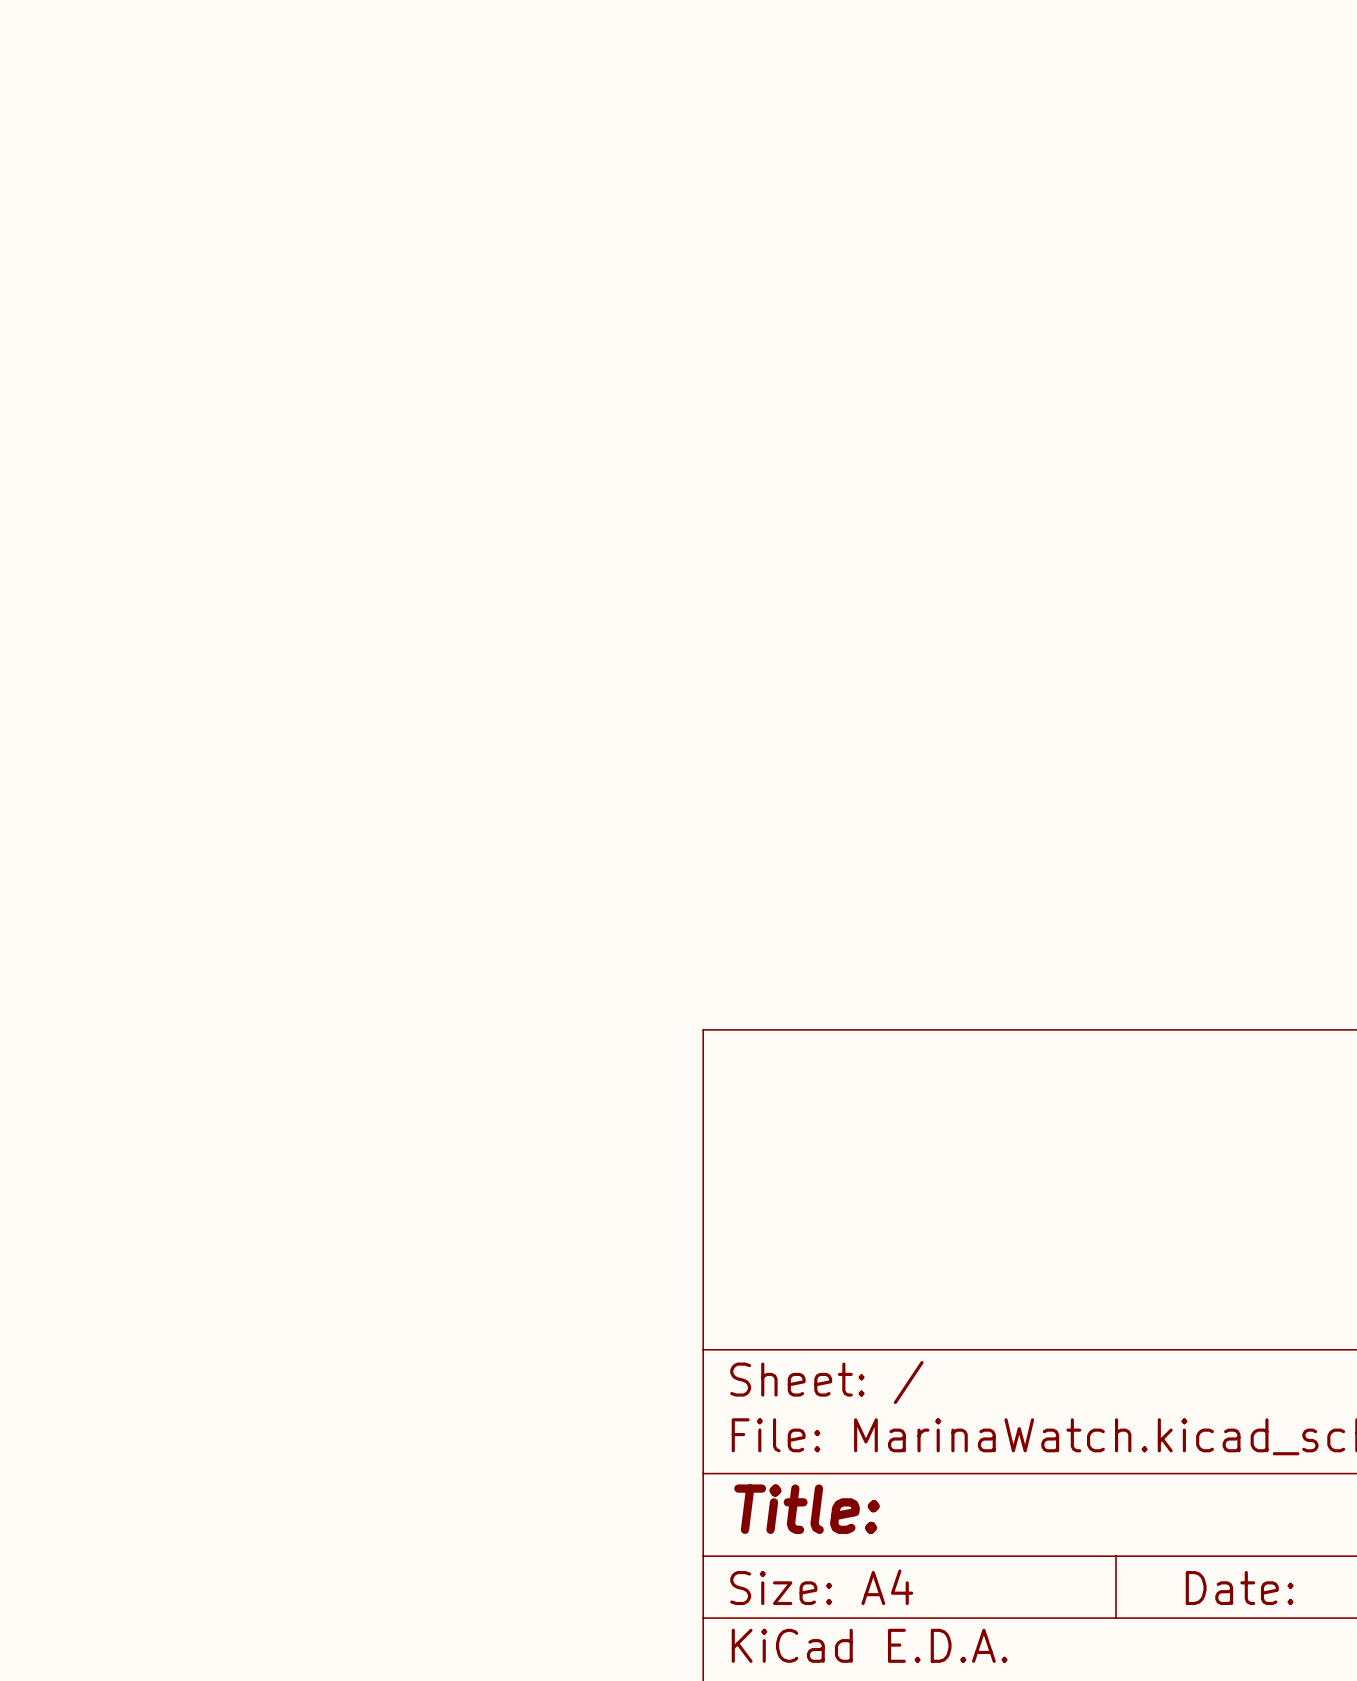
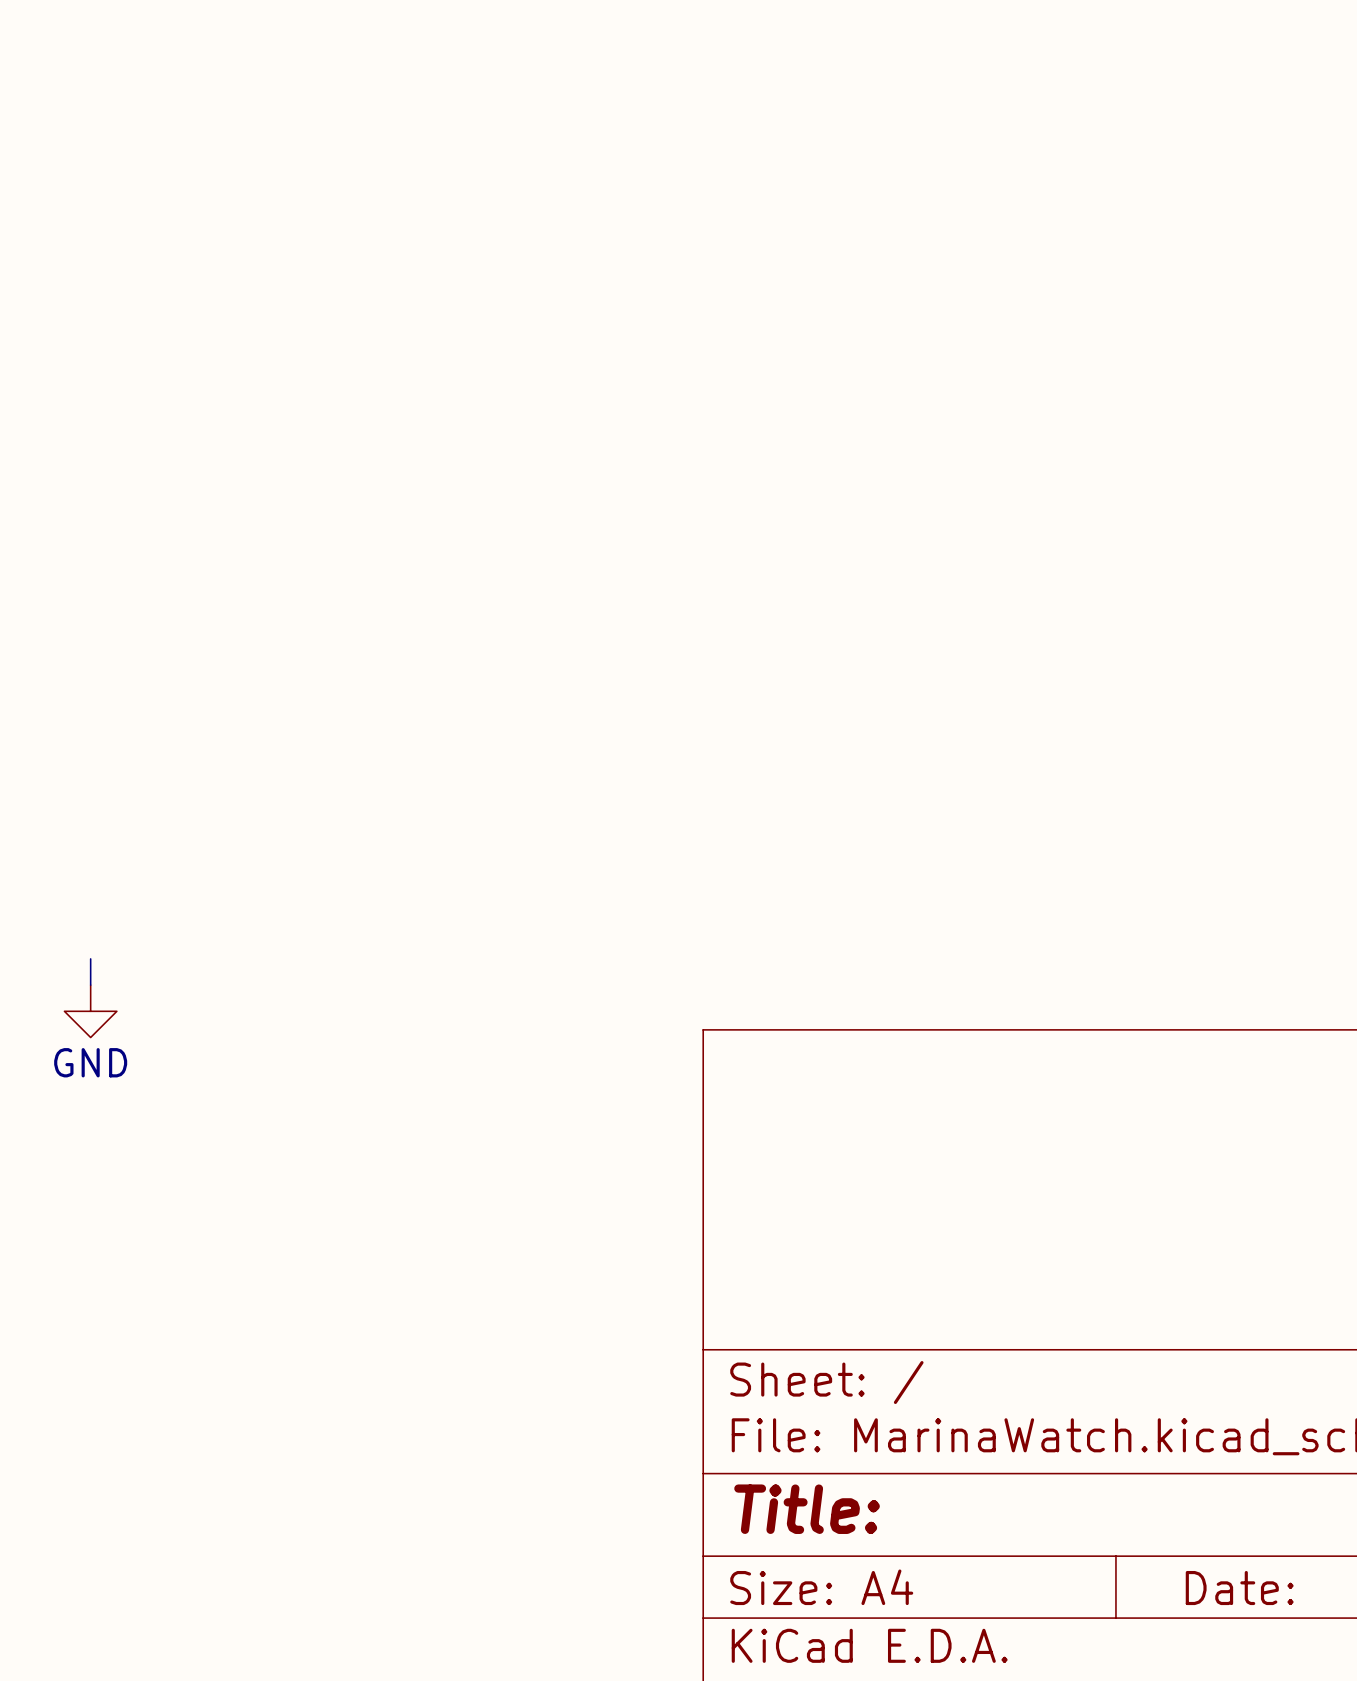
wire: none -> (90, 958) (90, 985)
power symbol: none -> GND (90, 1011)

